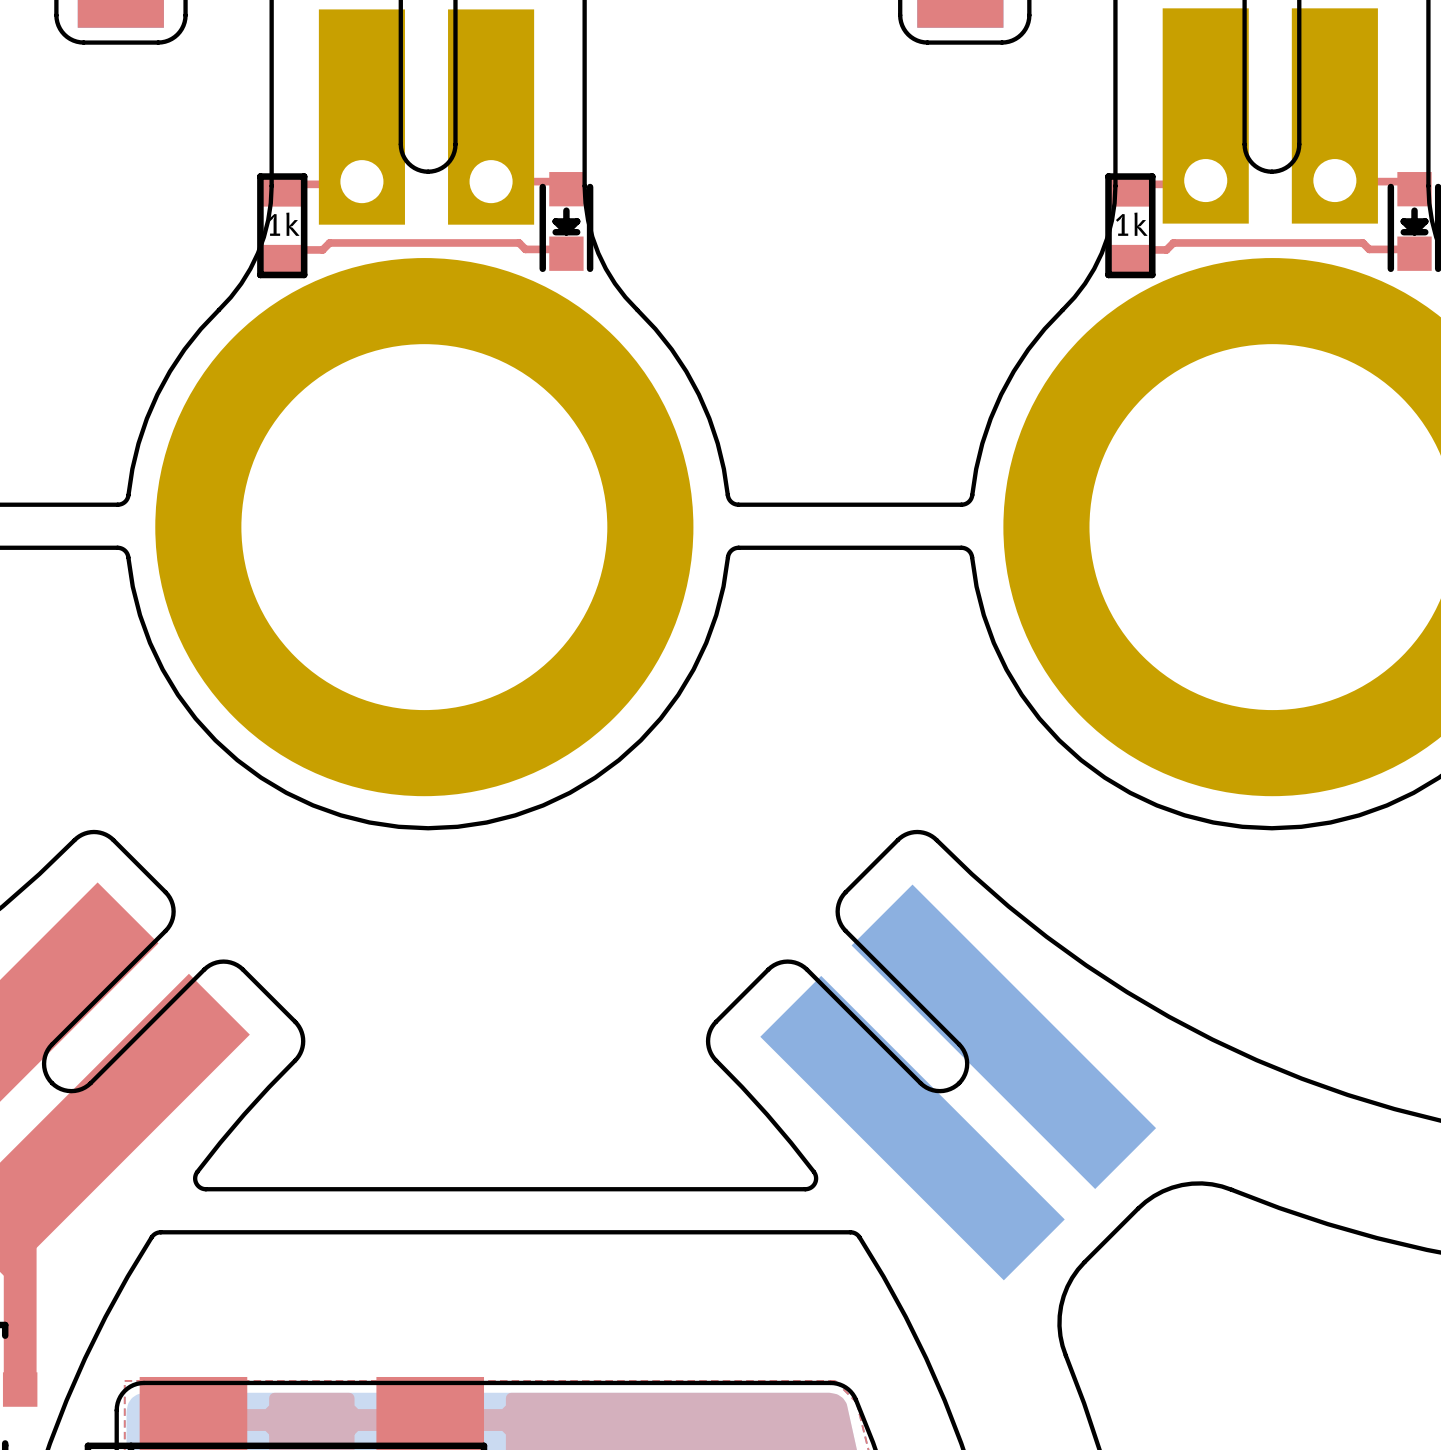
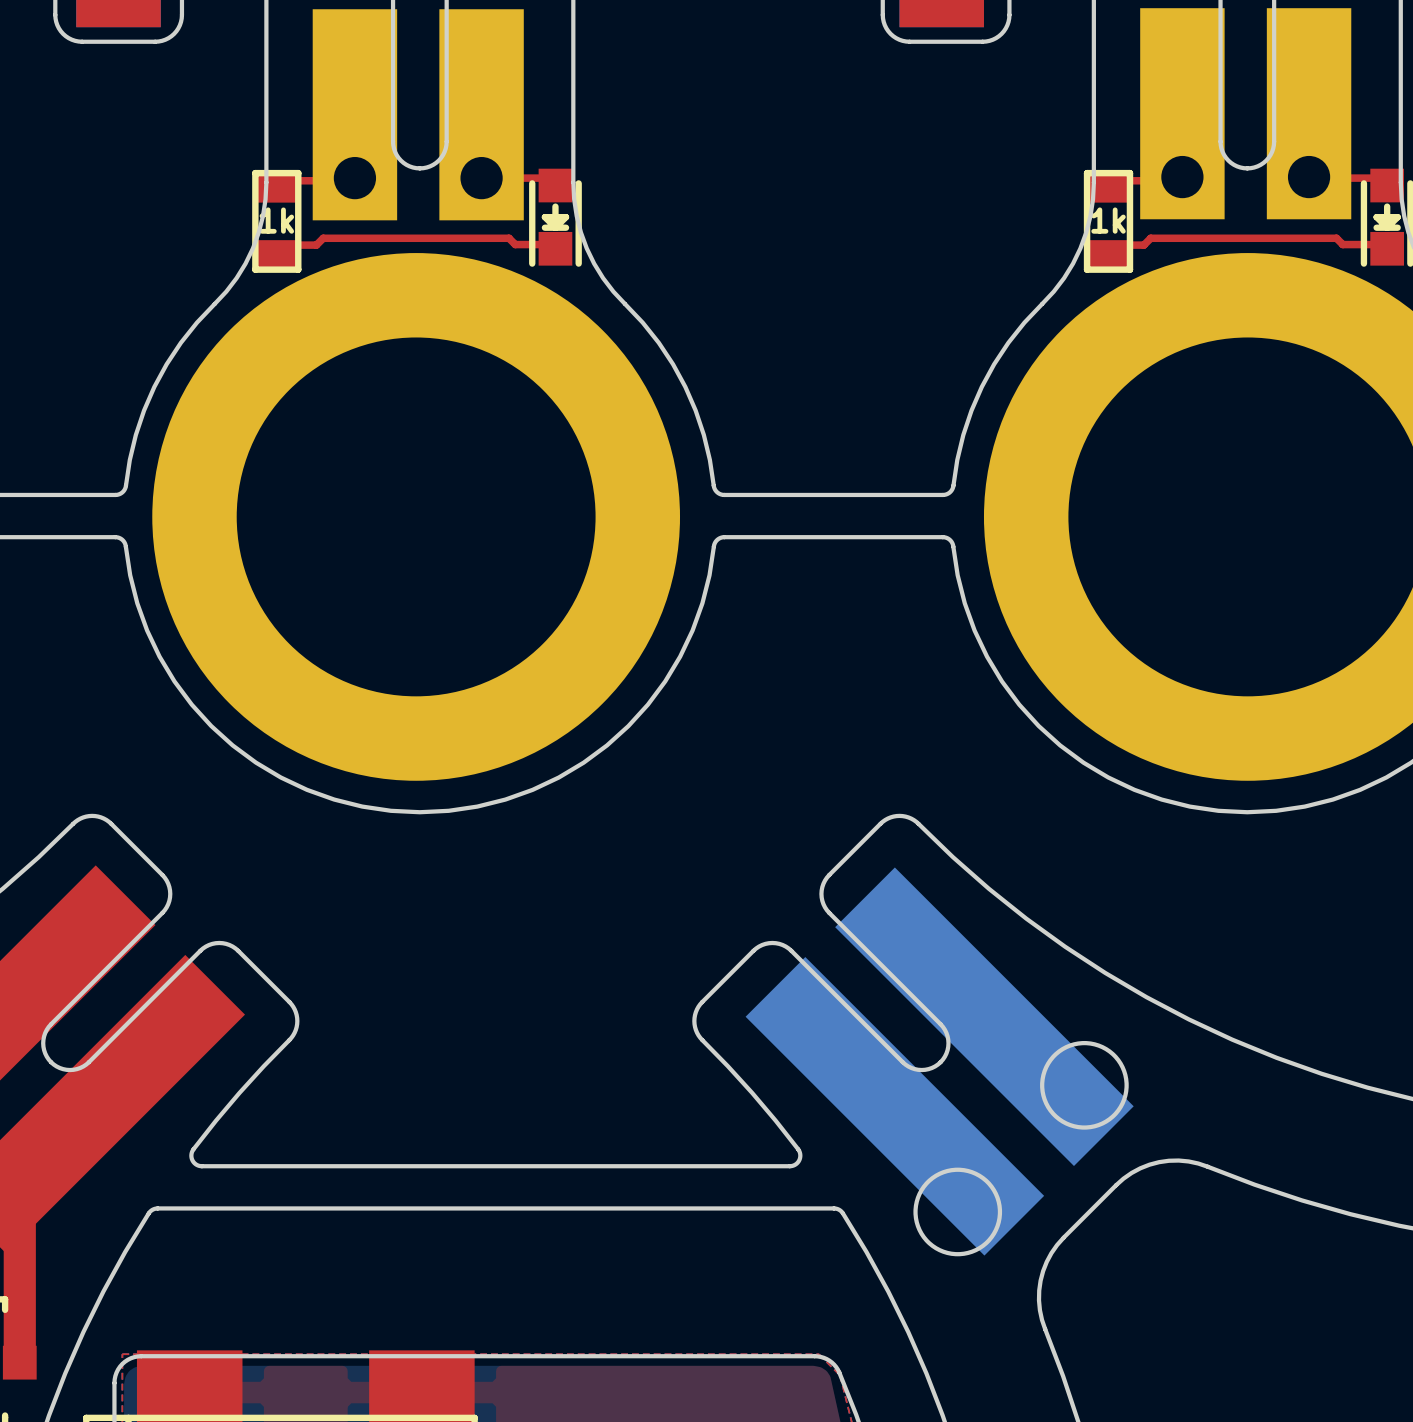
round board edge: none -> [1040, 1040, 1129, 1130]
round board edge: none -> [913, 1167, 1003, 1257]

